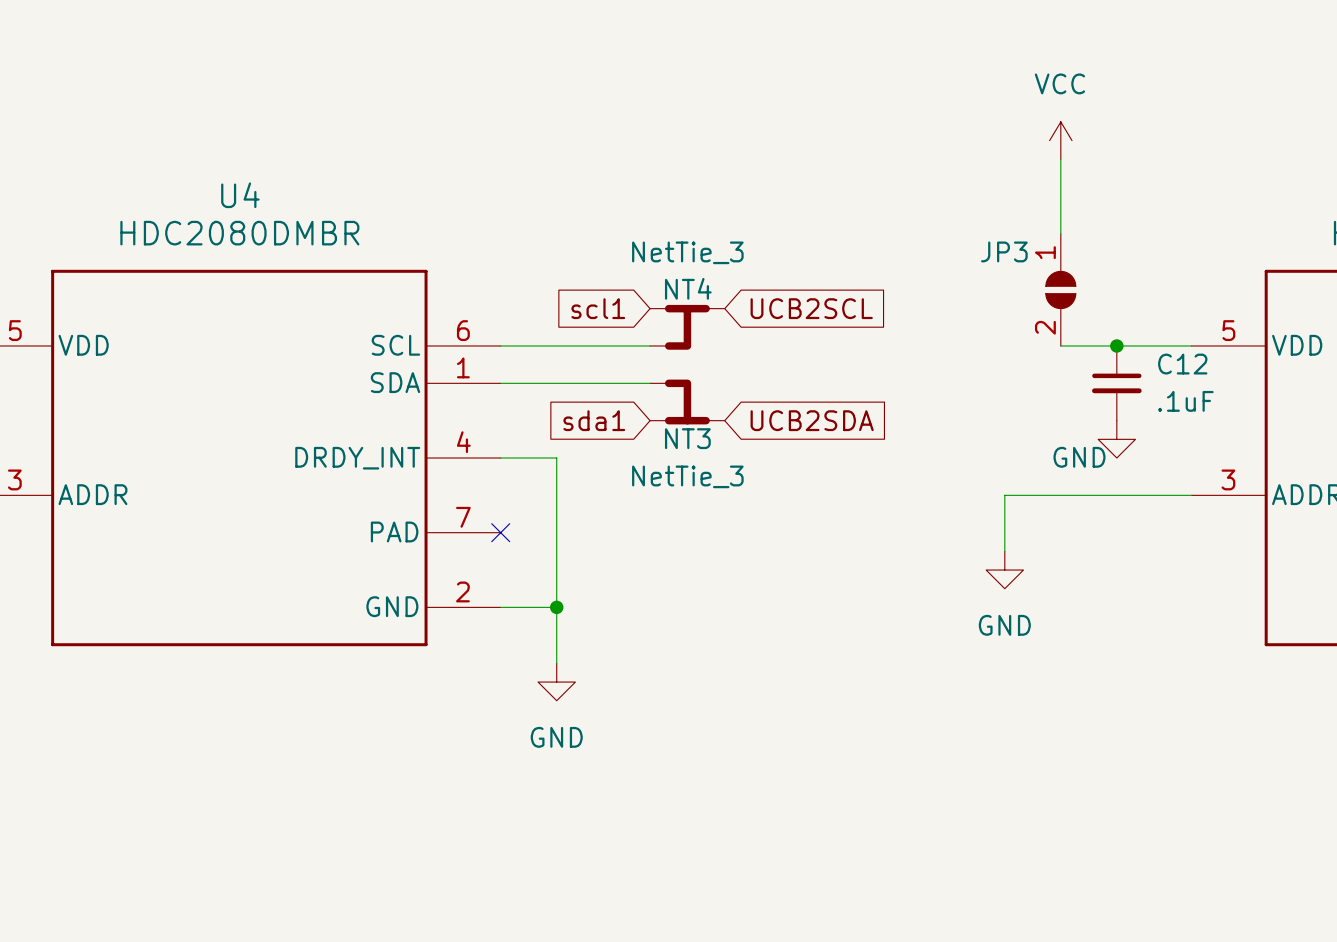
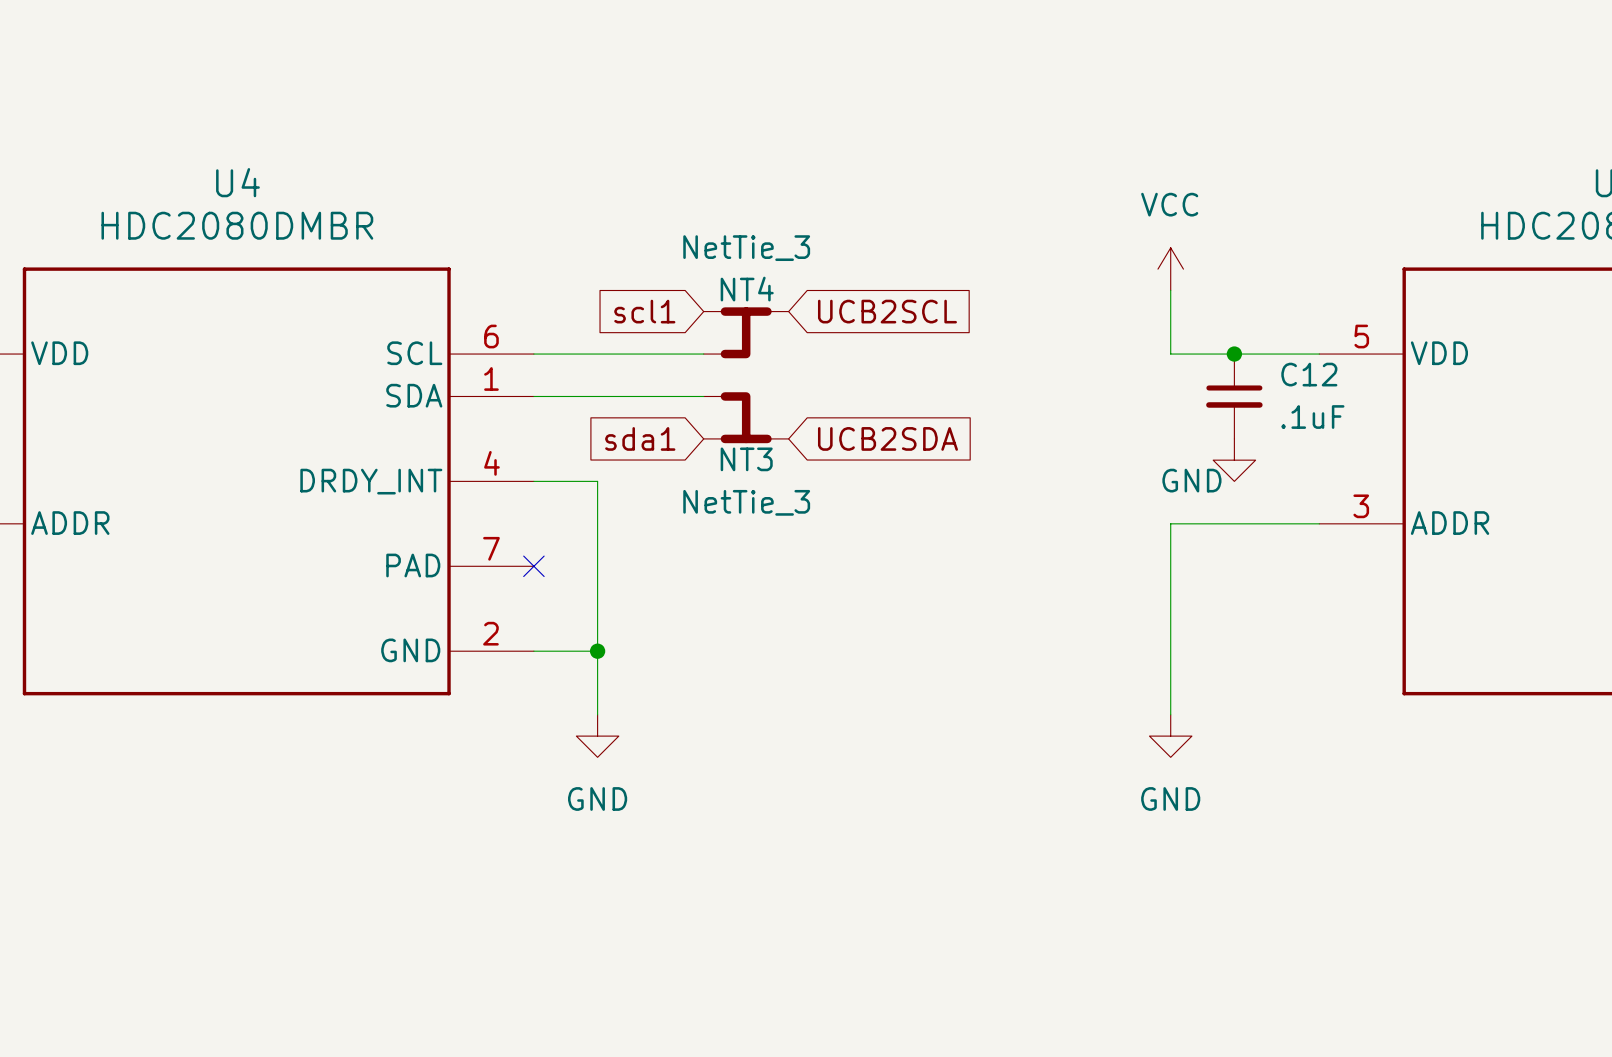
power symbol position: VCC (1060, 140) -> VCC (1170, 269)
wire: (1060, 159) (1060, 233) -> none
JP3: (1060, 289) -> none
wire: (1060, 495) (1004, 495) (1004, 551) -> (1170, 523) (1170, 714)
power symbol position: GND (1004, 570) -> GND (1170, 736)

